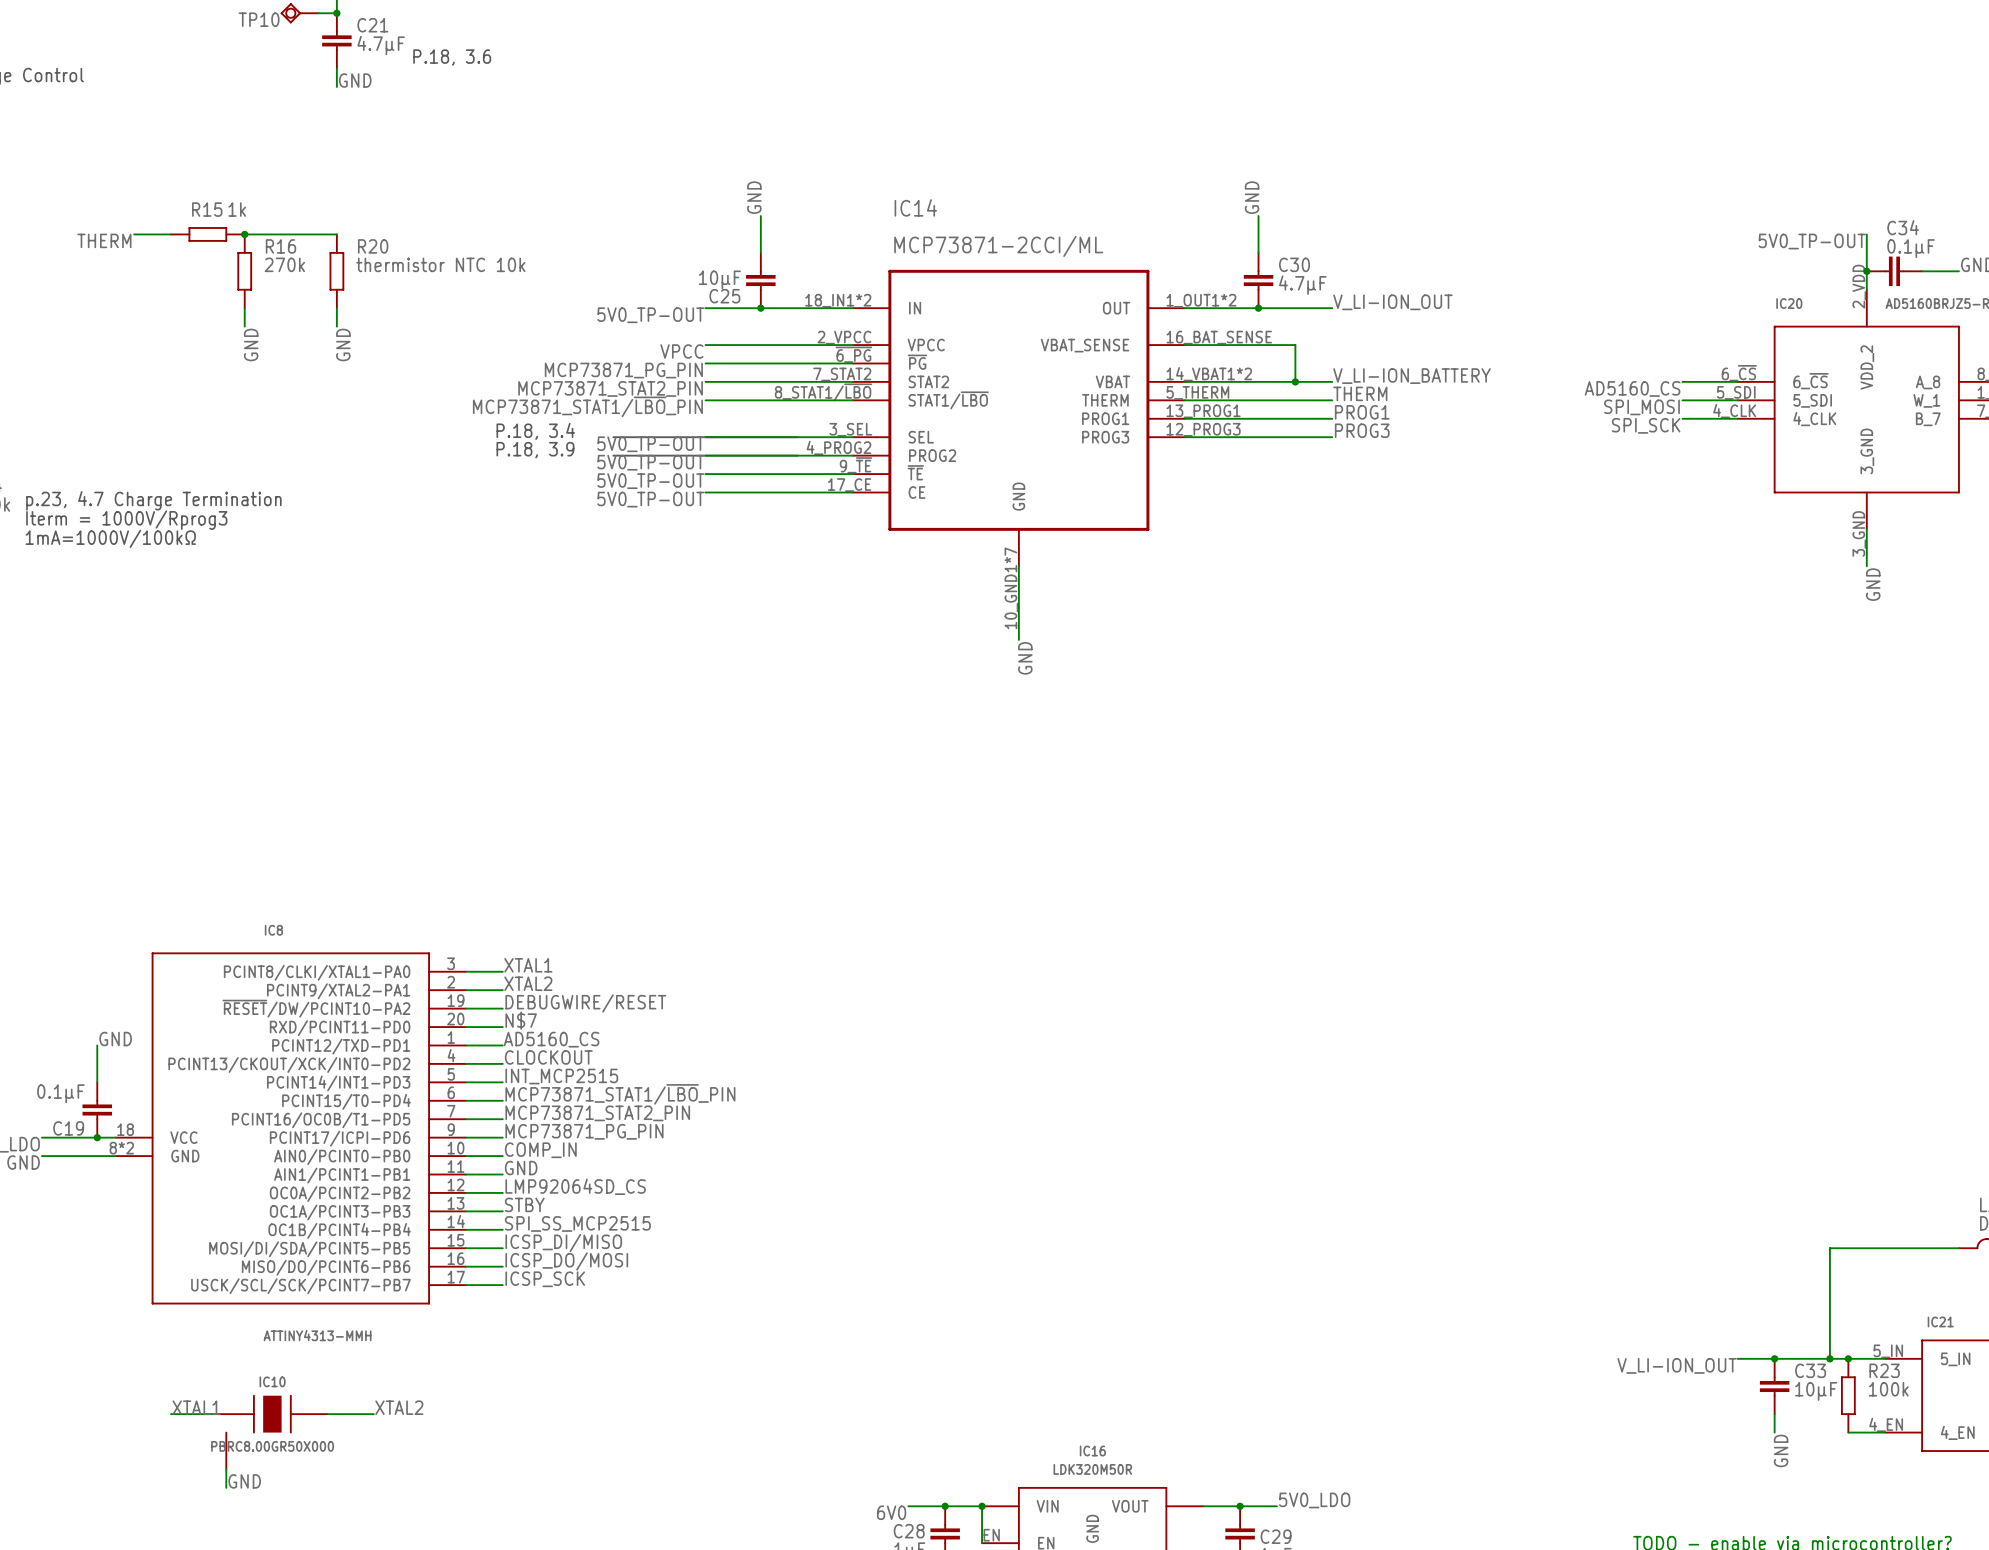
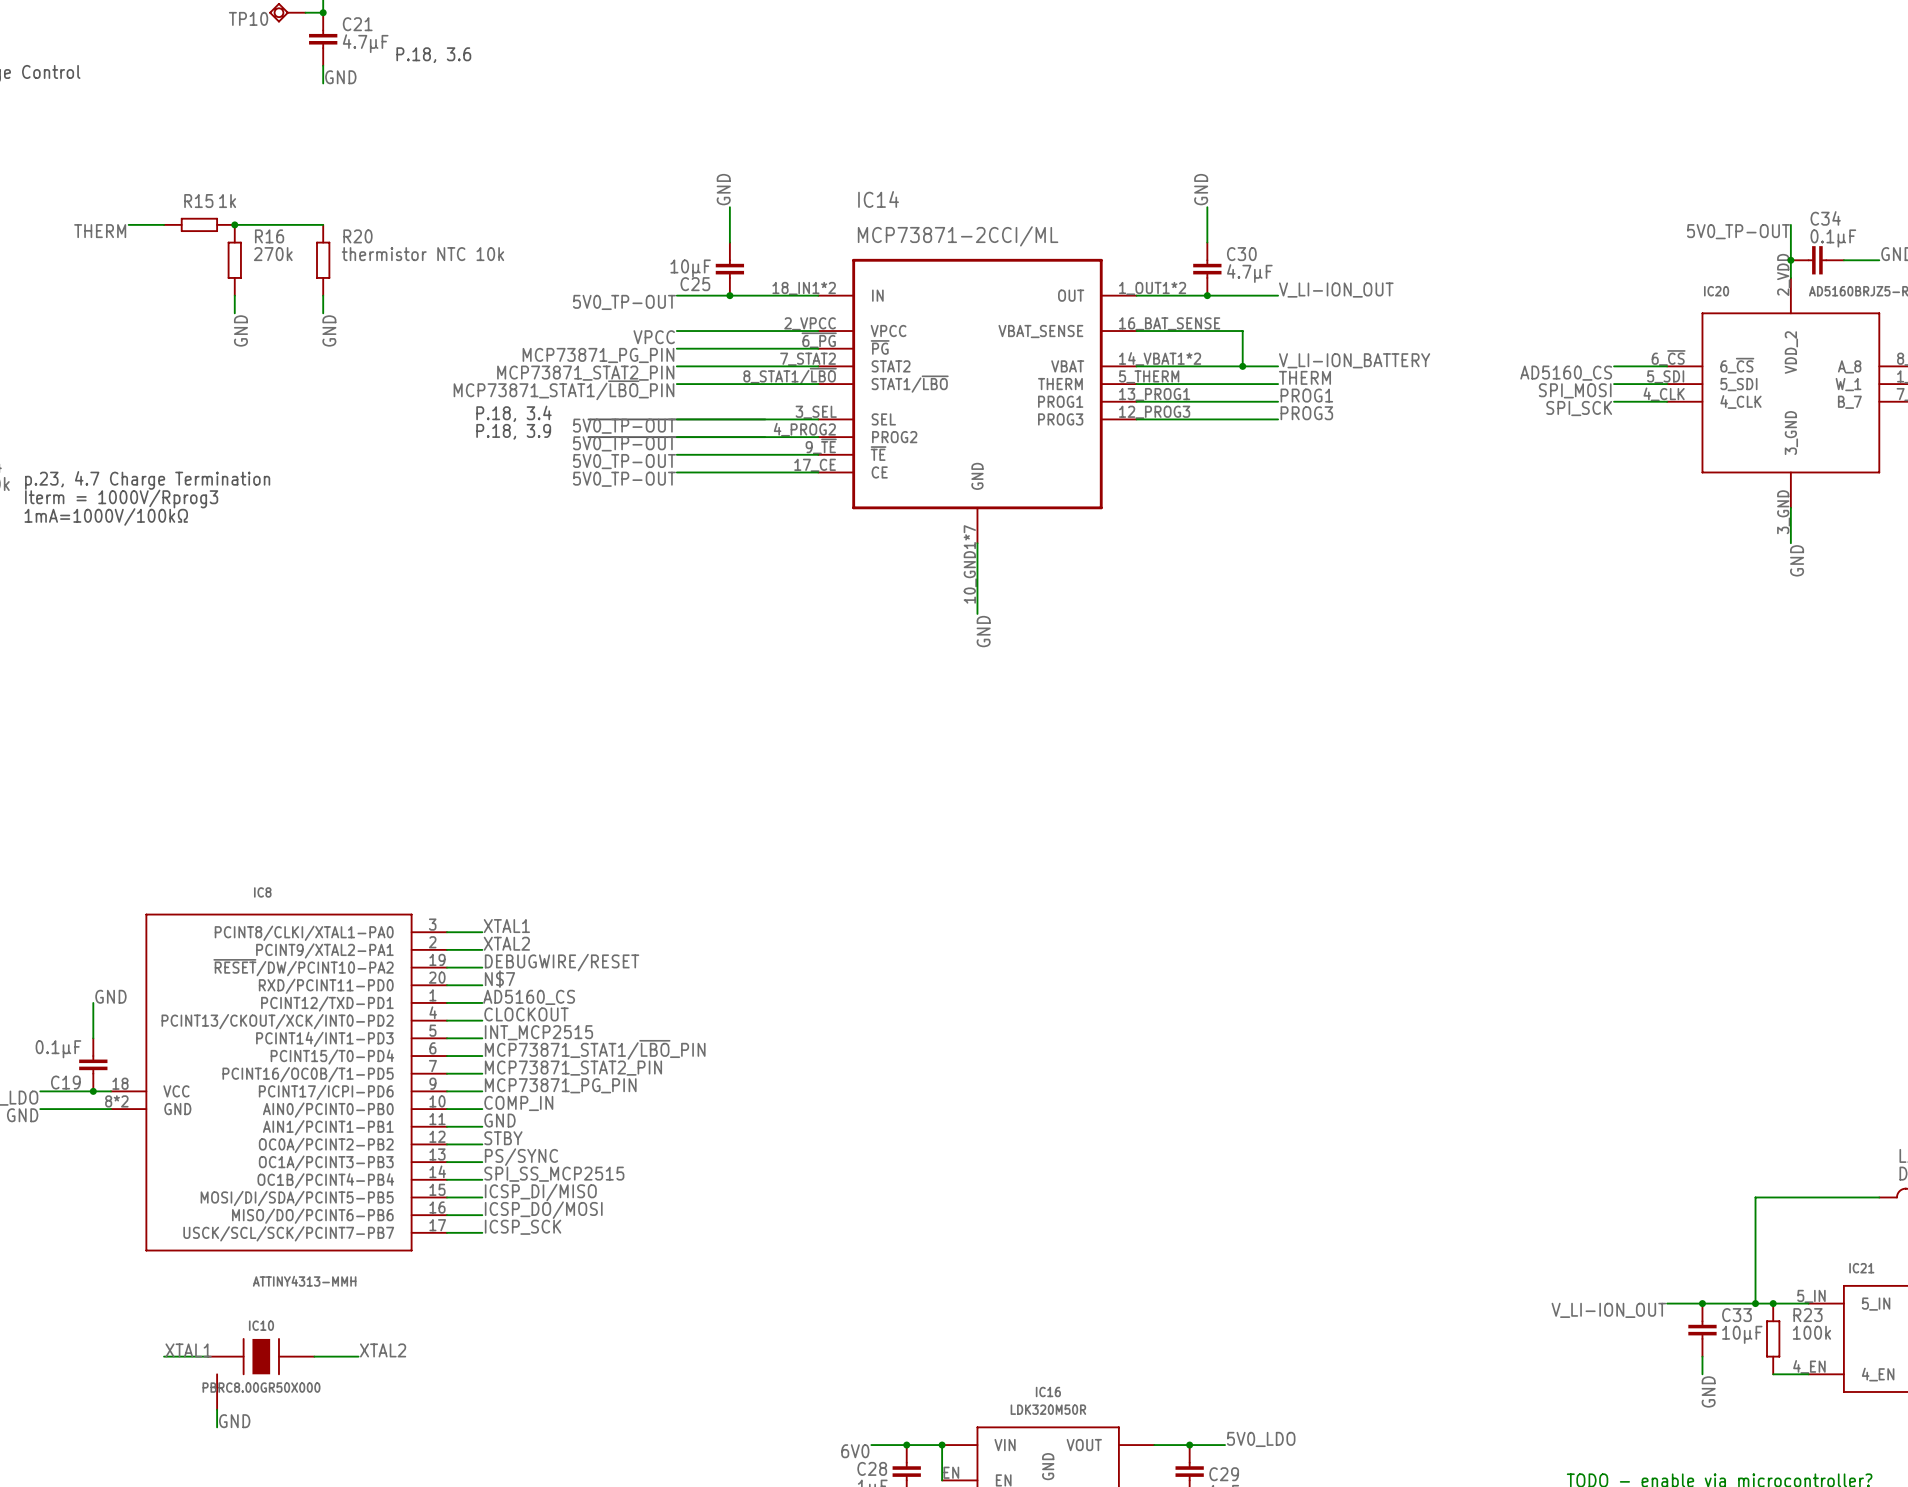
label: LMP92064SD_CS (575, 1186) -> STBY (503, 1138)
label: STBY (524, 1204) -> PS/SYNC (521, 1157)

